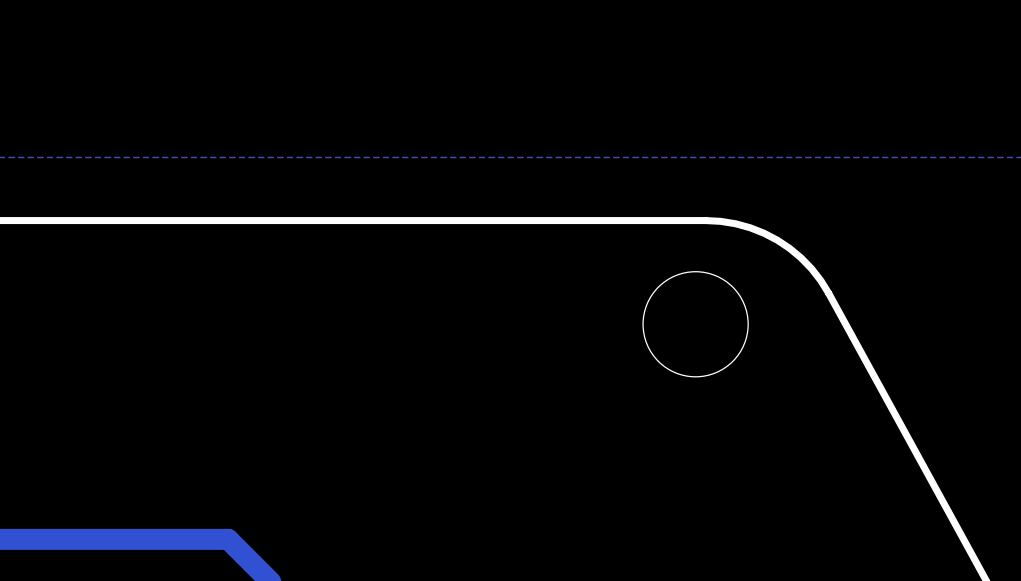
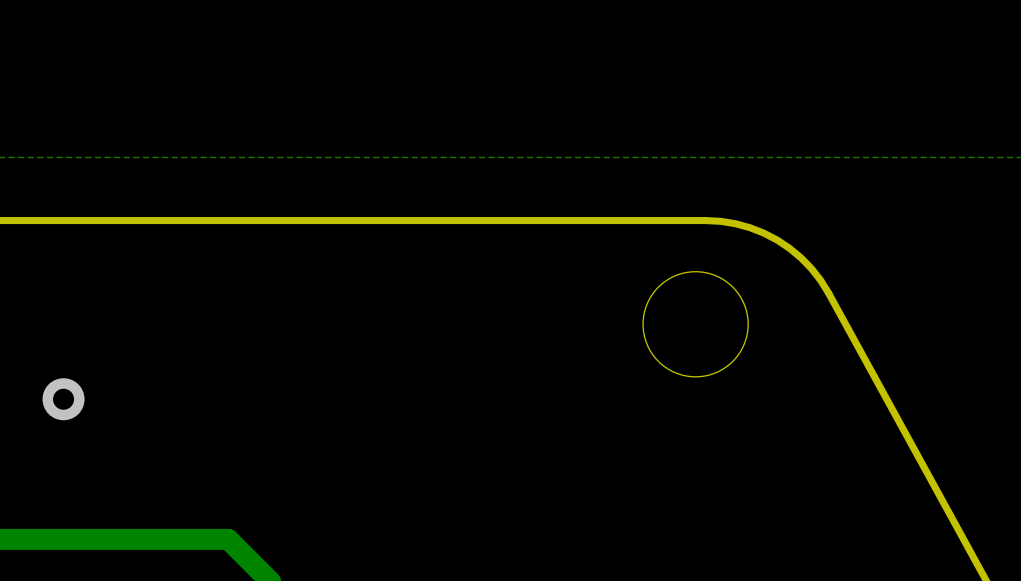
via: none -> (63, 399)

